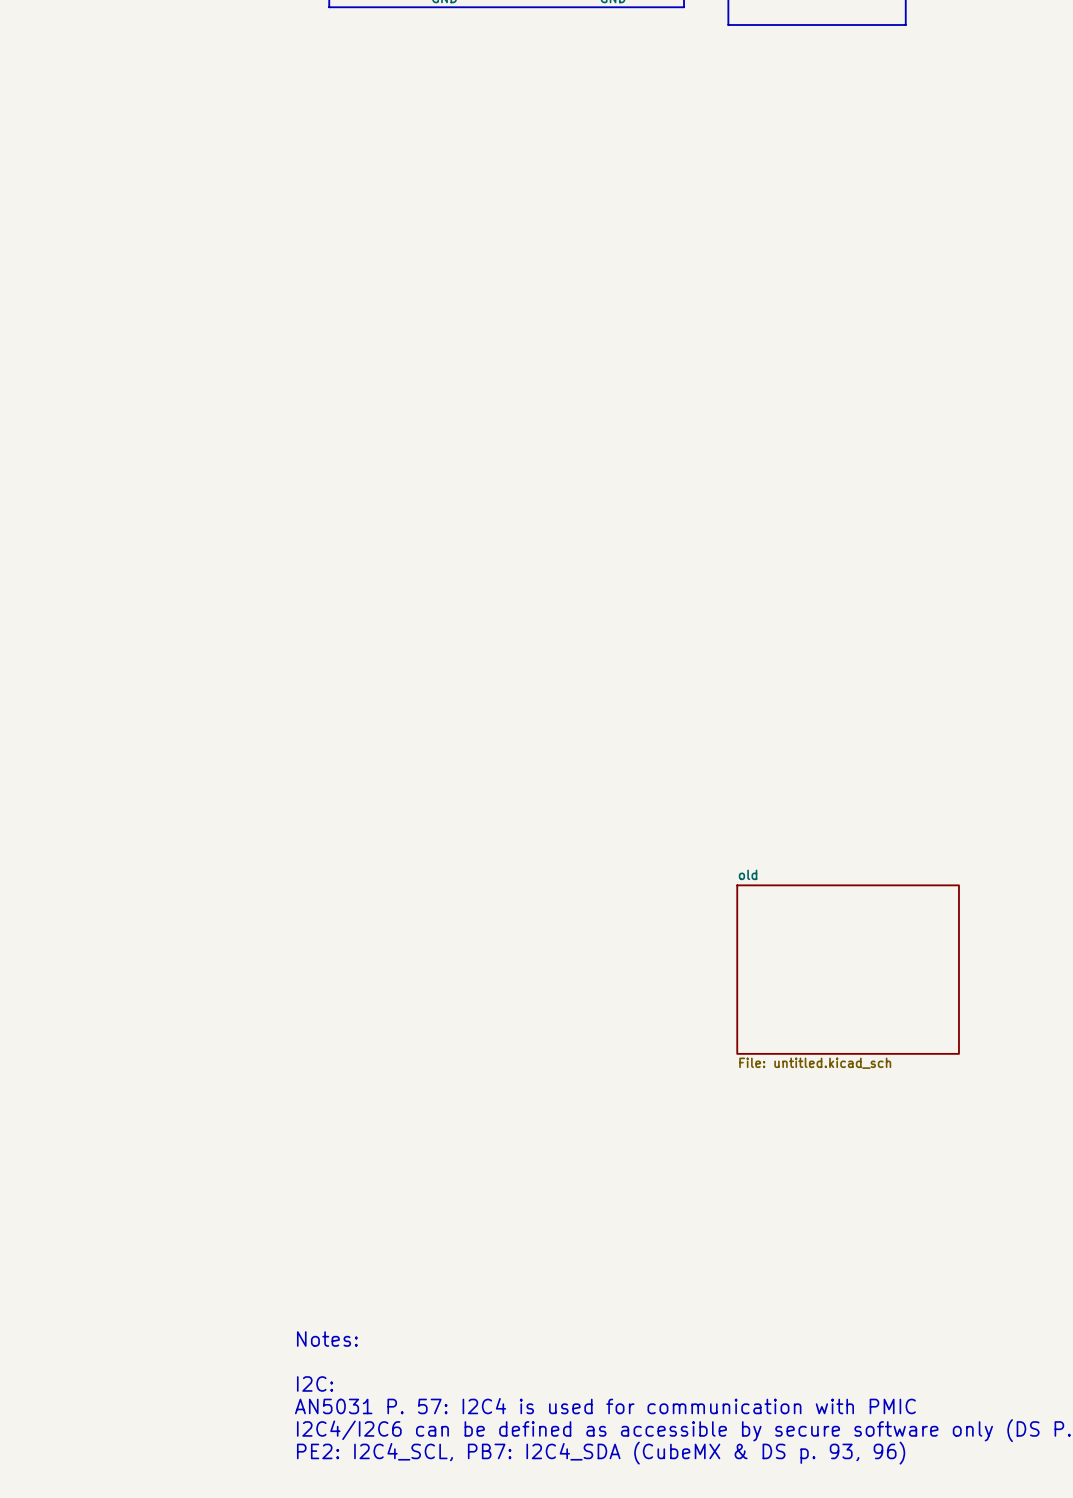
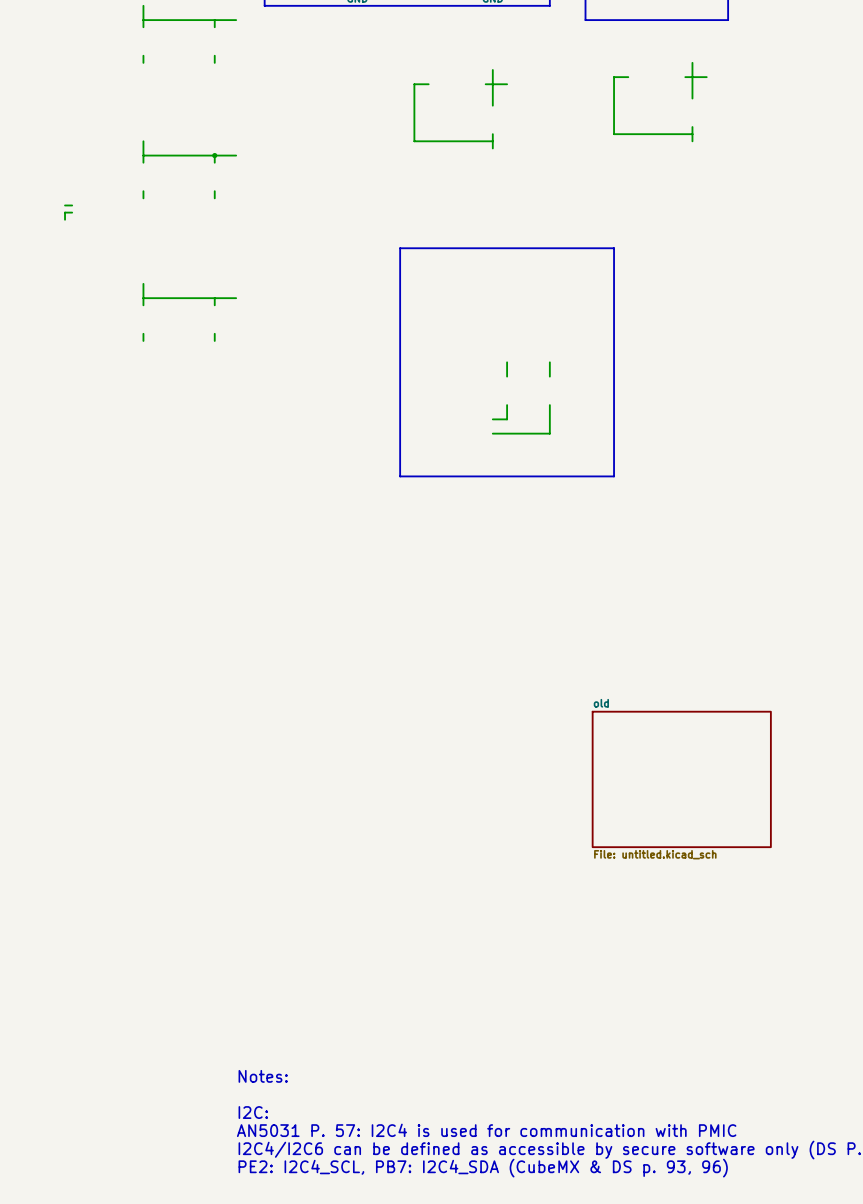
wire: none -> (143, 5) (143, 27)
wire: none -> (143, 20) (236, 20)
wire: none -> (214, 20) (214, 27)
wire: none -> (143, 55) (143, 62)
wire: none -> (214, 55) (214, 62)
wire: none -> (692, 62) (692, 98)
wire: none -> (492, 70) (492, 105)
wire: none -> (628, 77) (614, 77) (614, 134) (692, 134)
wire: none -> (685, 77) (706, 77)
wire: none -> (428, 84) (414, 84) (414, 141) (492, 141)
wire: none -> (485, 84) (507, 84)
wire: none -> (692, 127) (692, 141)
wire: none -> (492, 134) (492, 148)
wire: none -> (143, 141) (143, 162)
wire: none -> (143, 155) (236, 155)
wire: none -> (214, 155) (214, 162)
junction: none -> (214, 155)
wire: none -> (143, 191) (143, 198)
wire: none -> (214, 191) (214, 198)
wire: none -> (65, 205) (72, 205)
wire: none -> (72, 212) (65, 212) (65, 219)
line: none -> (400, 248) (400, 476) (614, 476) (614, 248) (400, 248)
wire: none -> (143, 283) (143, 305)
wire: none -> (143, 298) (236, 298)
wire: none -> (214, 298) (214, 305)
wire: none -> (143, 333) (143, 340)
wire: none -> (214, 333) (214, 340)
wire: none -> (507, 362) (507, 376)
wire: none -> (549, 362) (549, 376)
wire: none -> (507, 405) (507, 419) (492, 419)
wire: none -> (549, 405) (549, 433) (492, 433)

